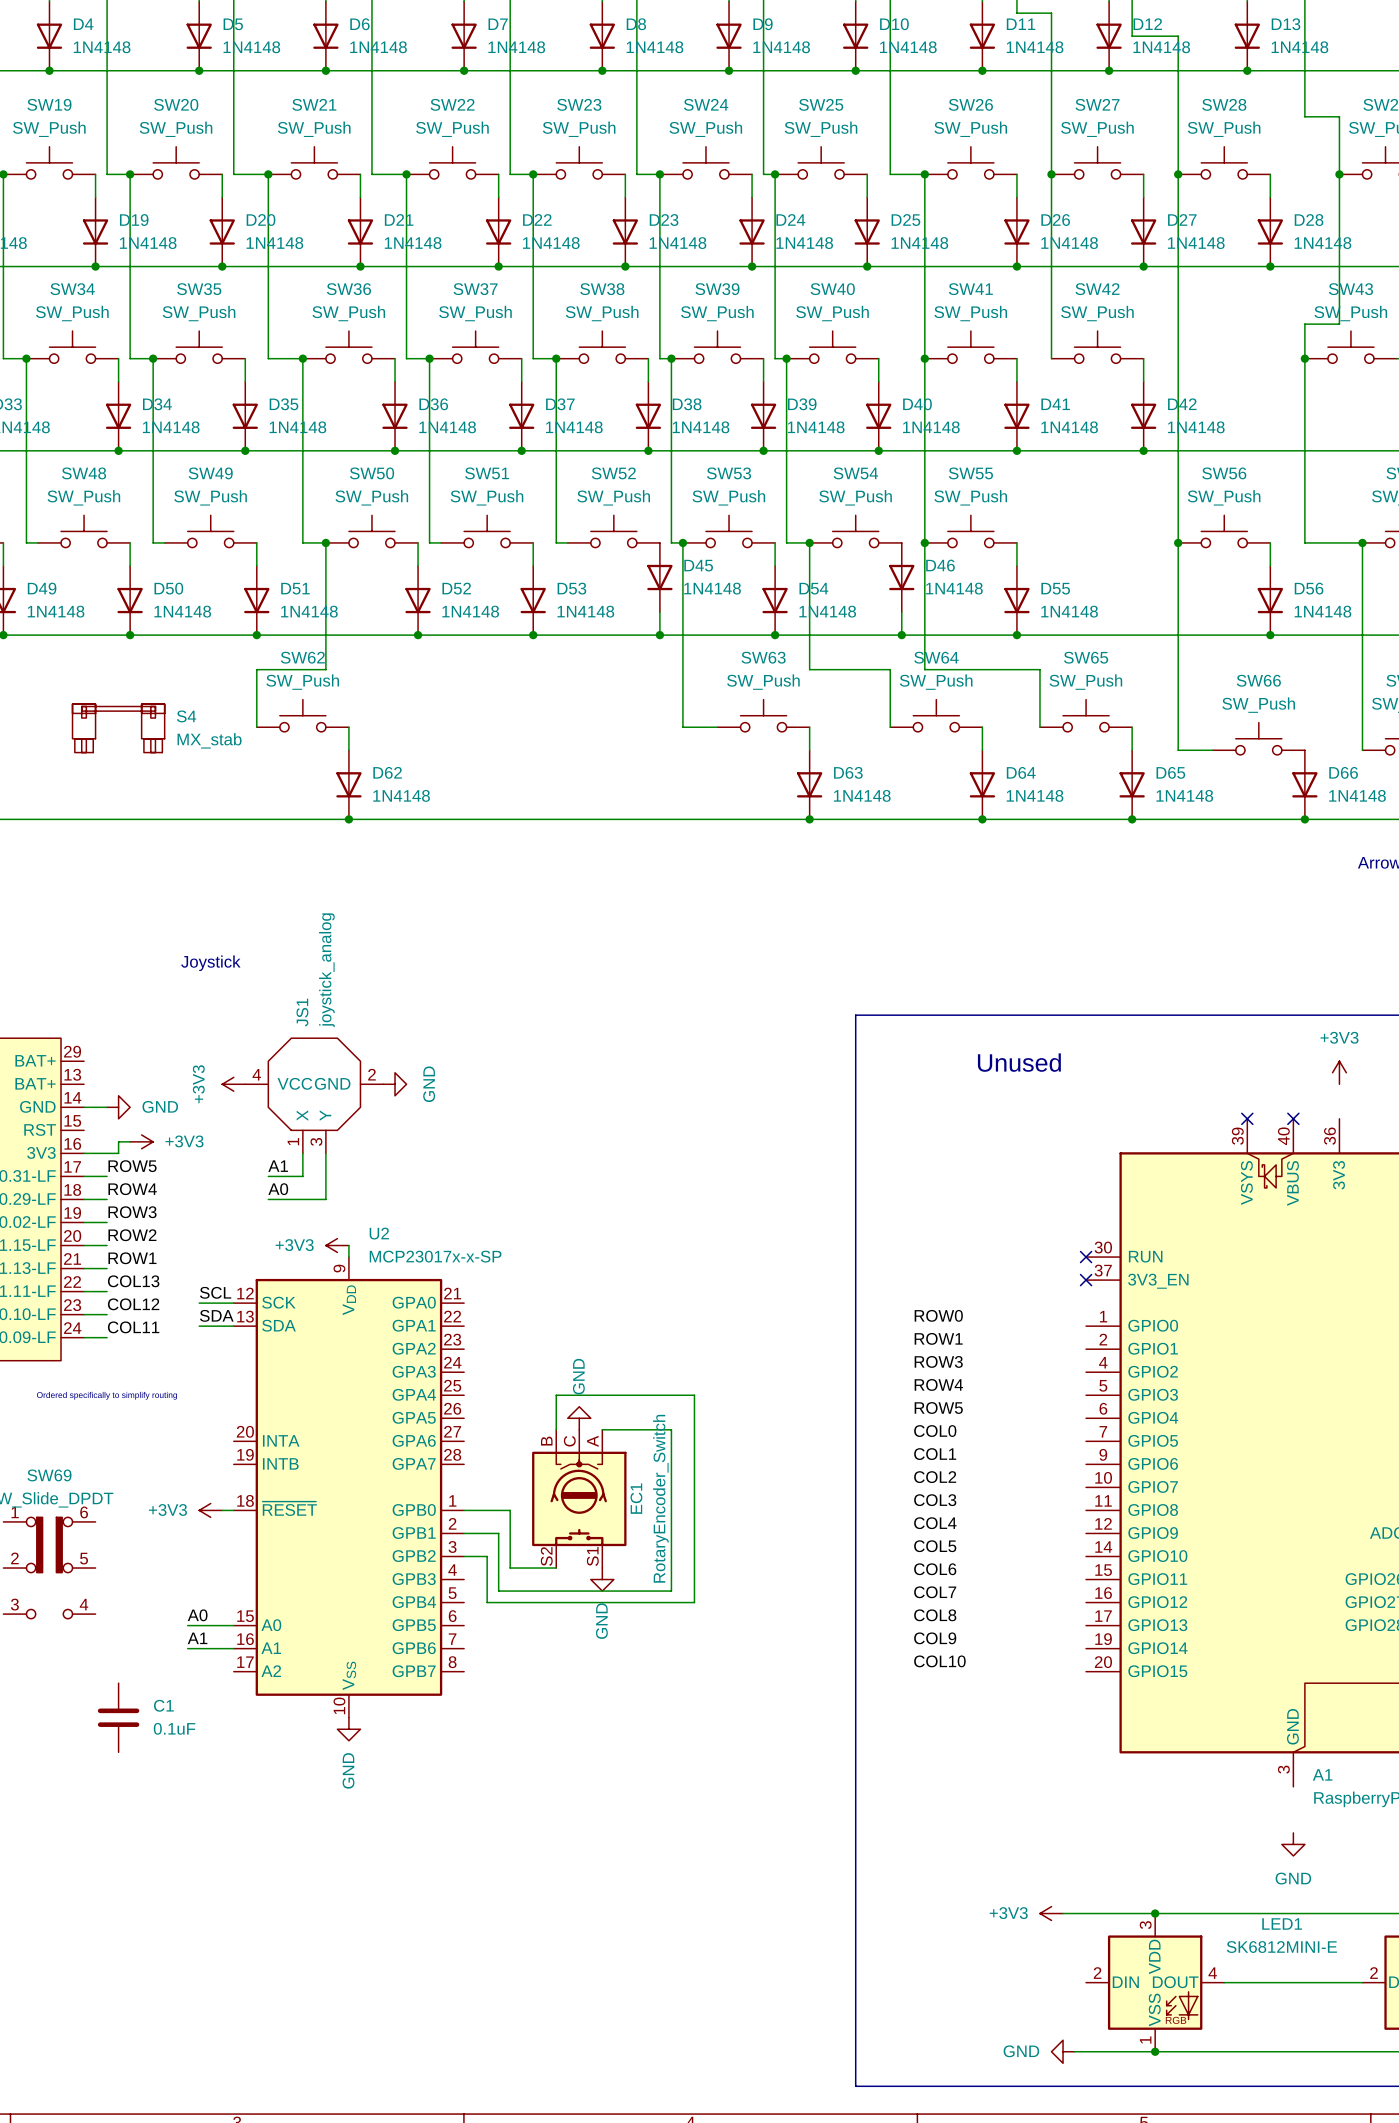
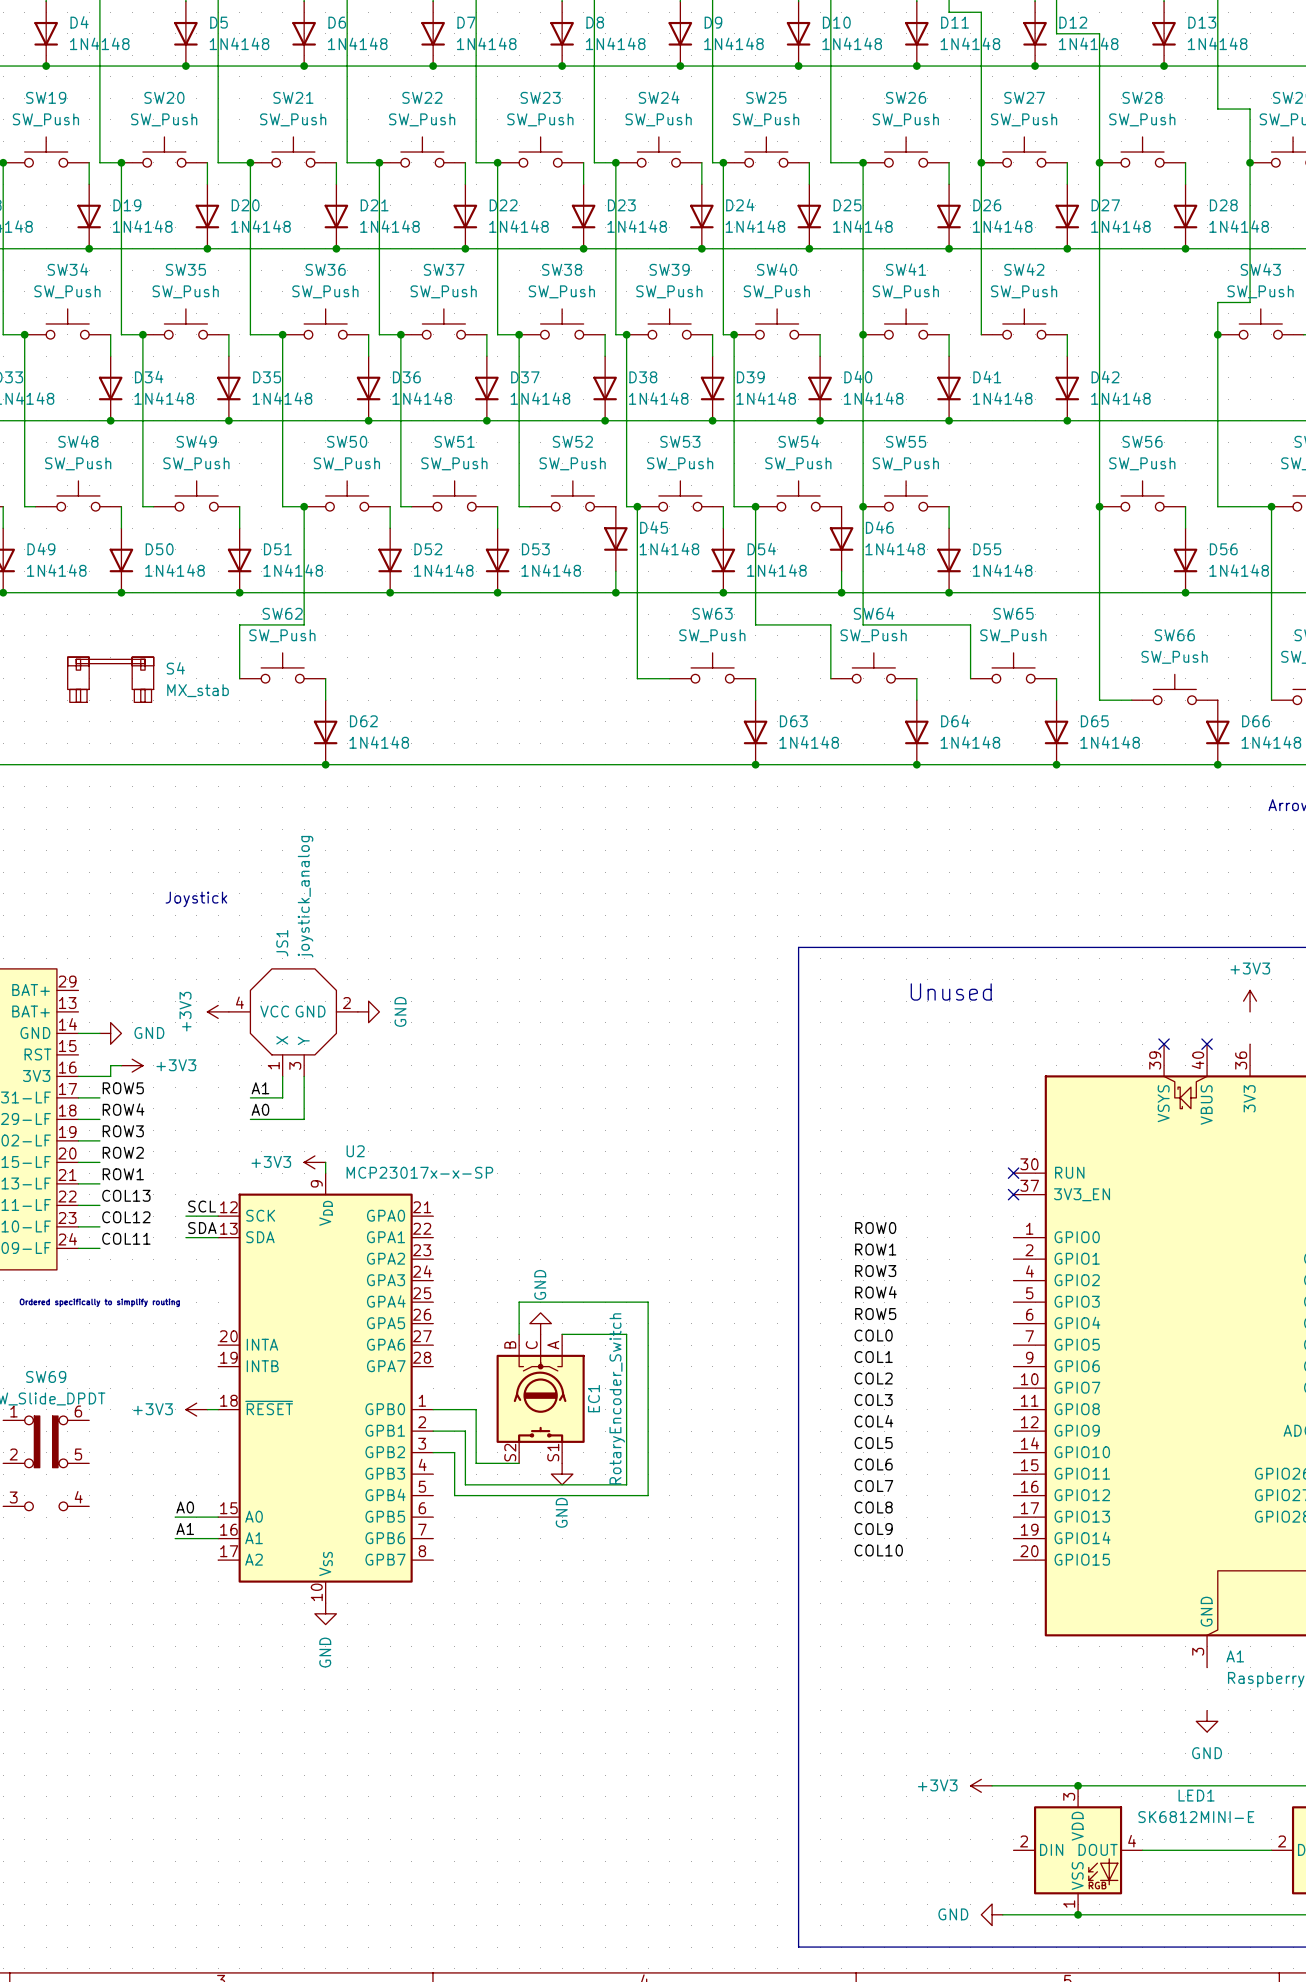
C1: 0.1uF (118, 1717) -> none

